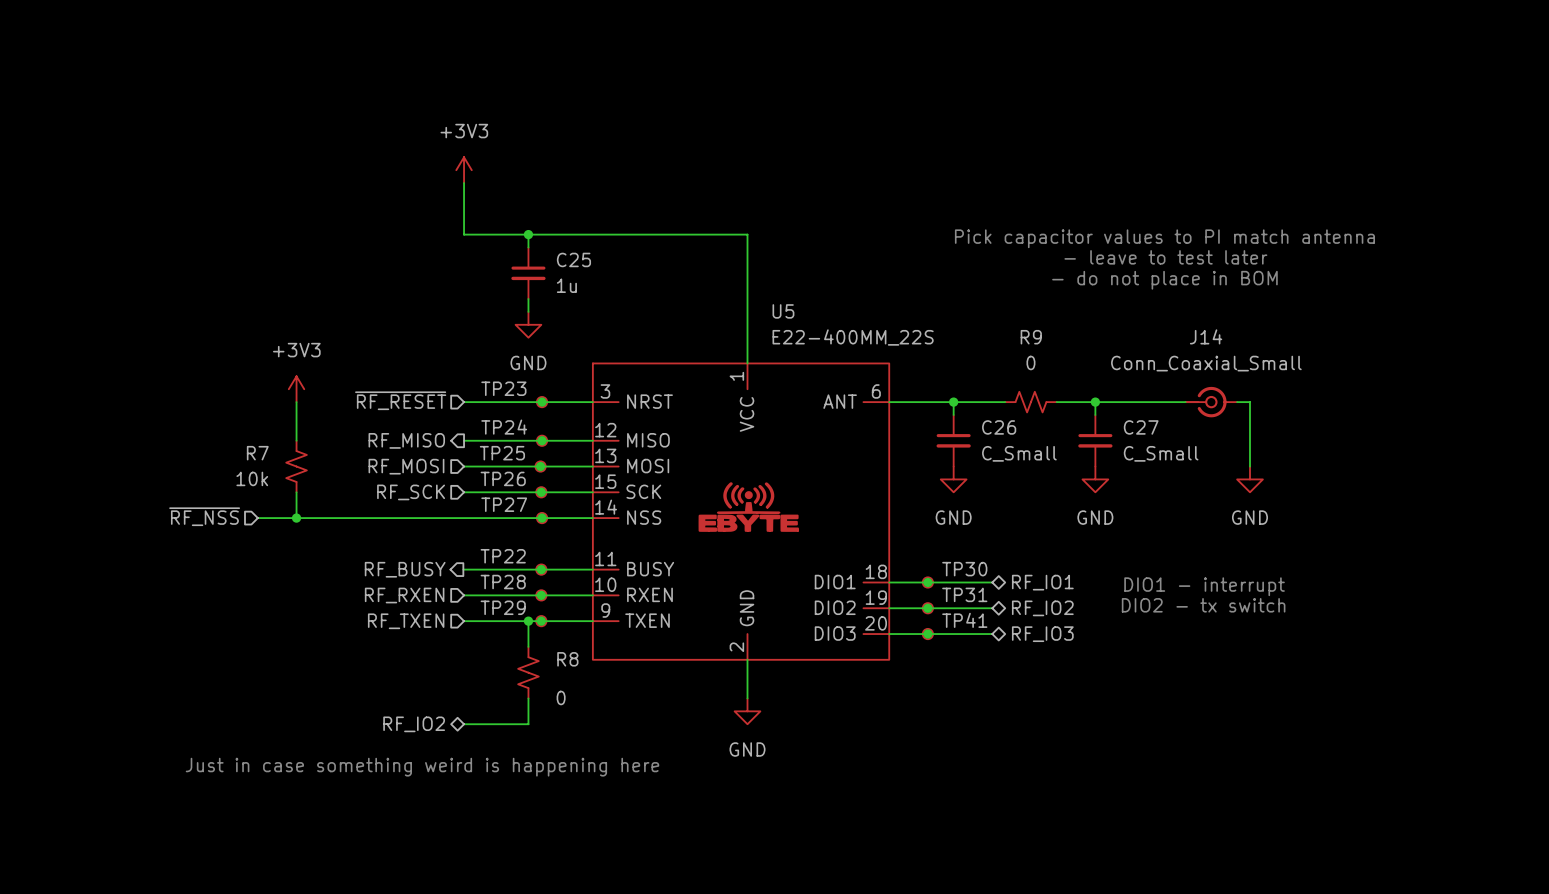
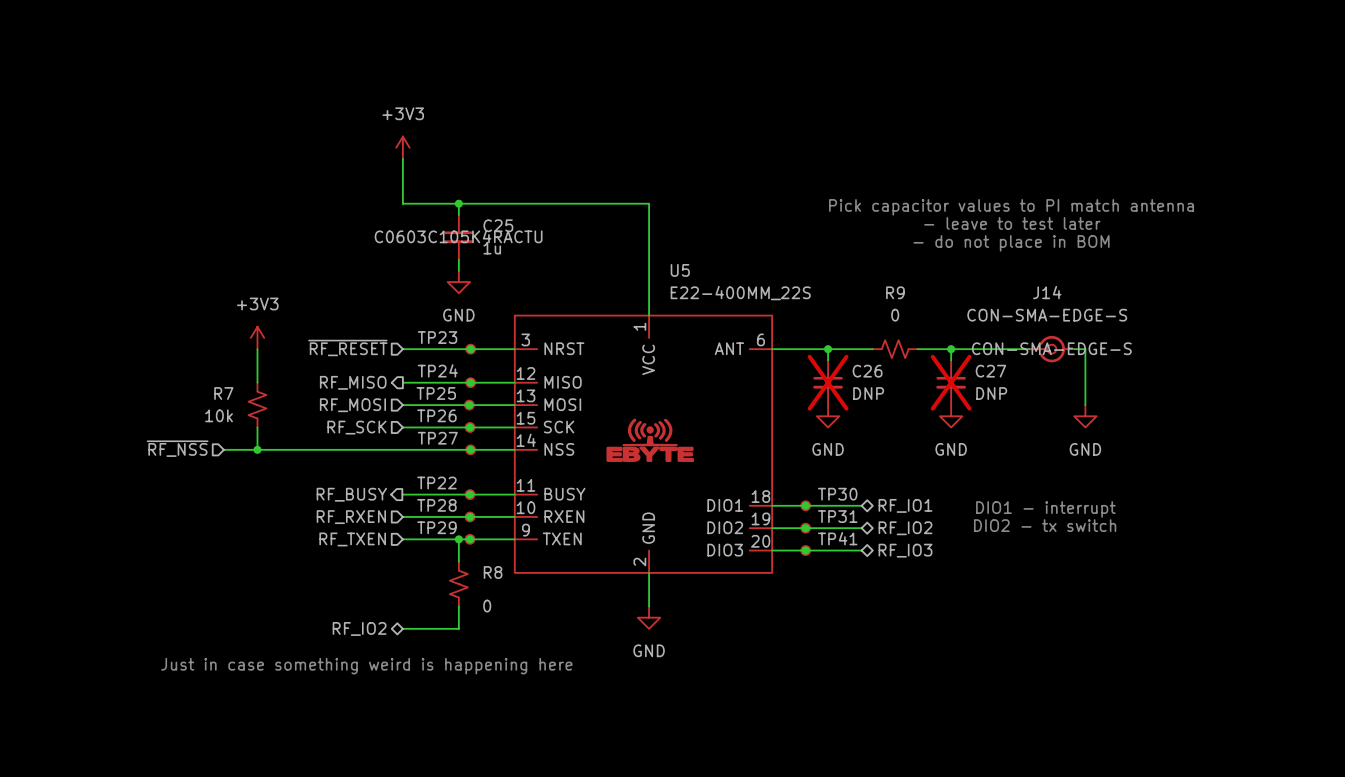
C25 text: none -> C0603C105K4RACTU (458, 236)
J14 value: Conn_Coaxial_Small (1206, 363) -> CON-SMA-EDGE-S (1047, 315)
J14 text: none -> CON-SMA-EDGE-S (1051, 348)
C26 do-not-place cross: none -> (828, 382)
C27 do-not-place cross: none -> (951, 382)
C26 value: C_Small (1019, 453) -> DNP (868, 393)
C27 value: C_Small (1161, 453) -> DNP (991, 393)

